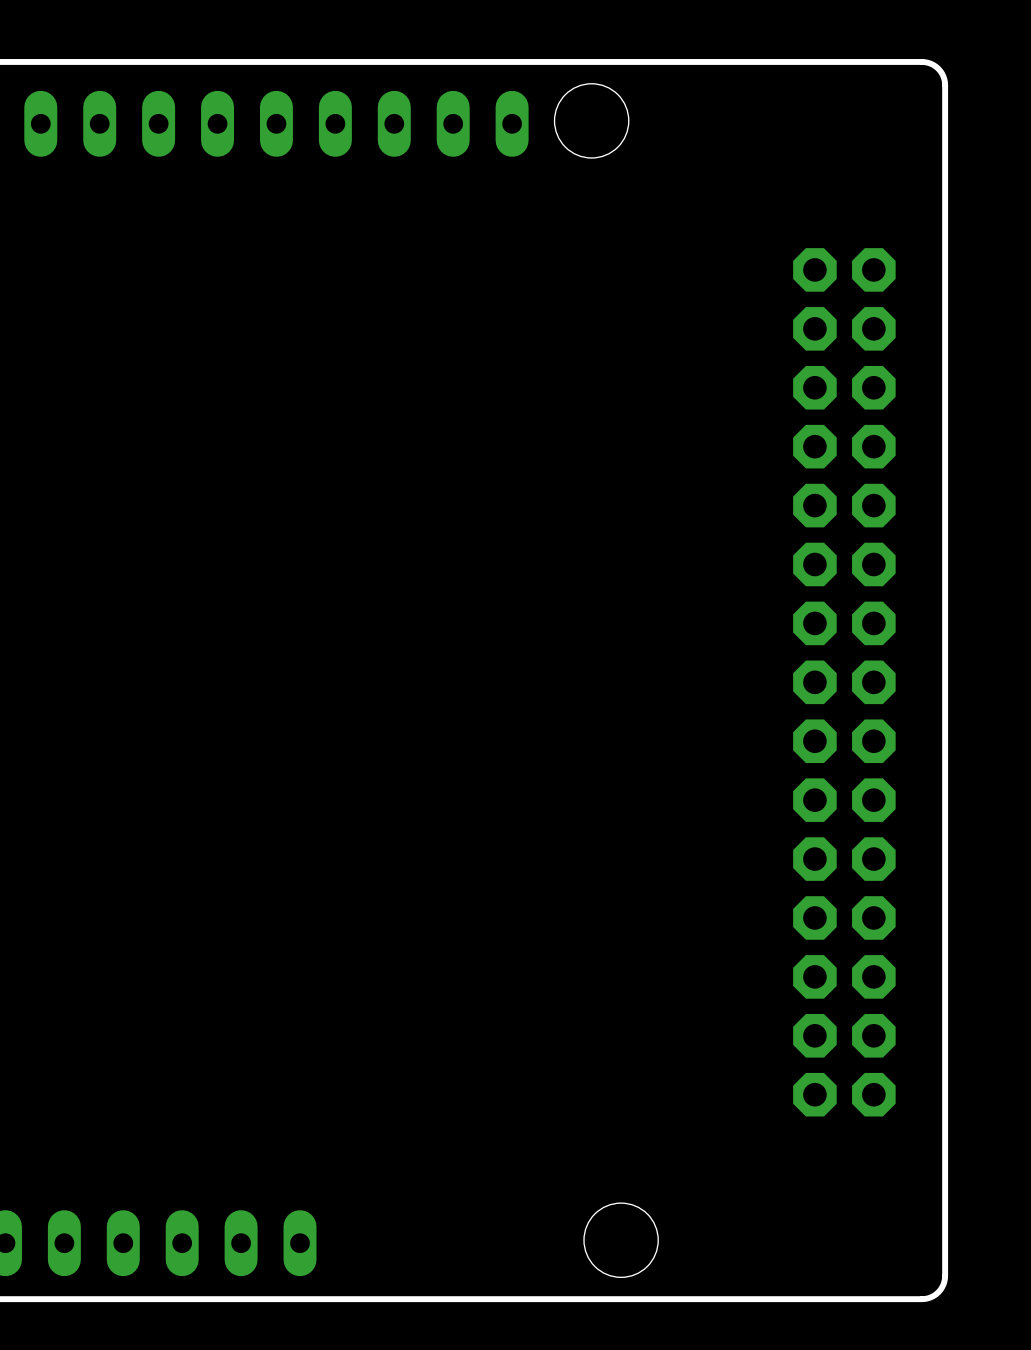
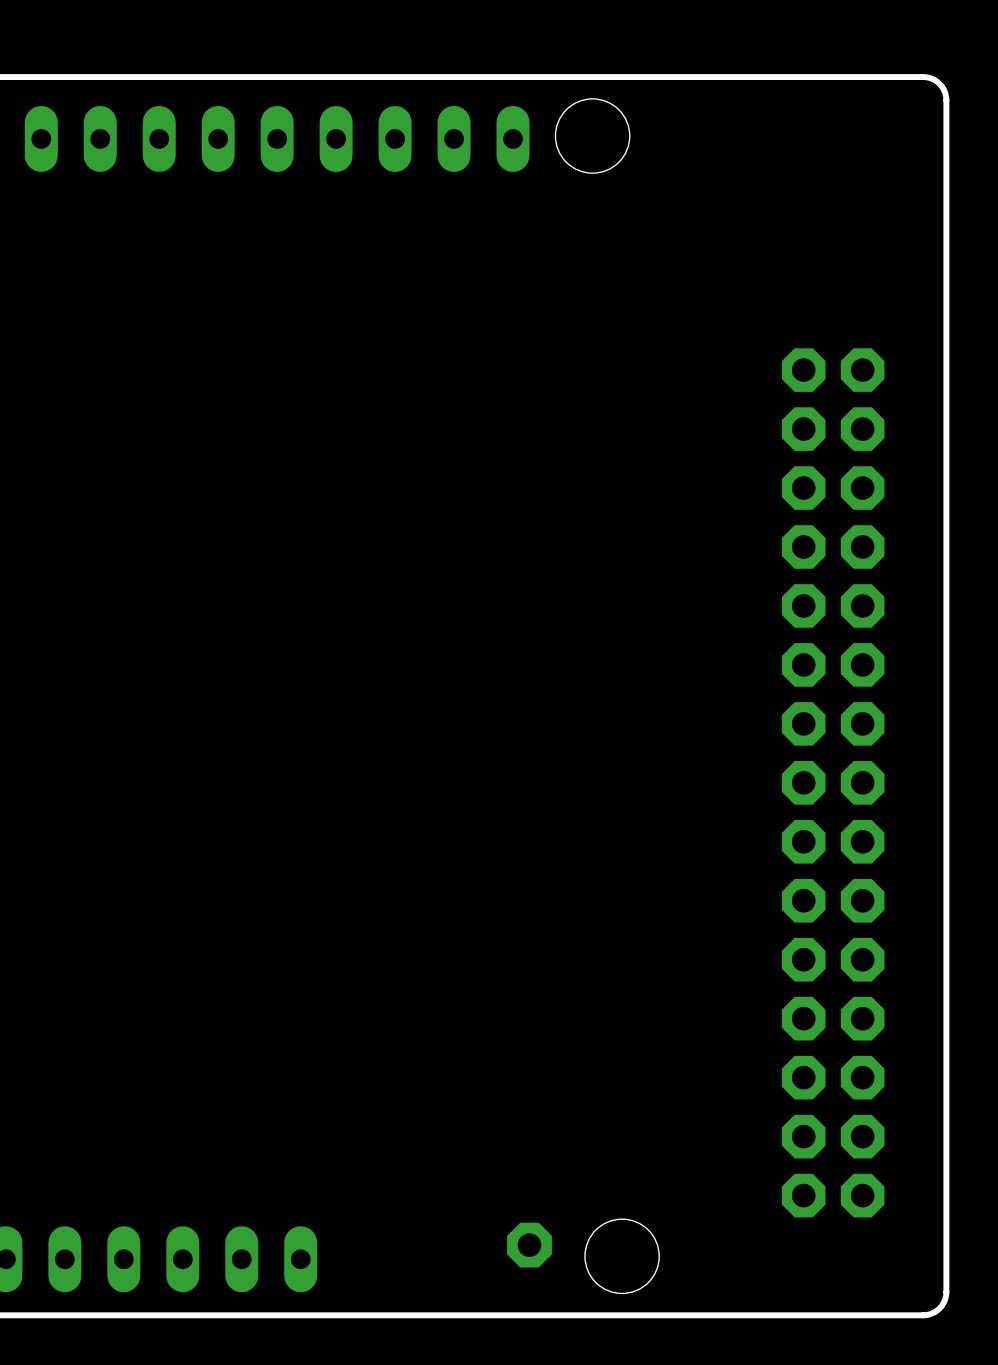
part position: (844, 682) -> (833, 782)
part: none -> (529, 1245)

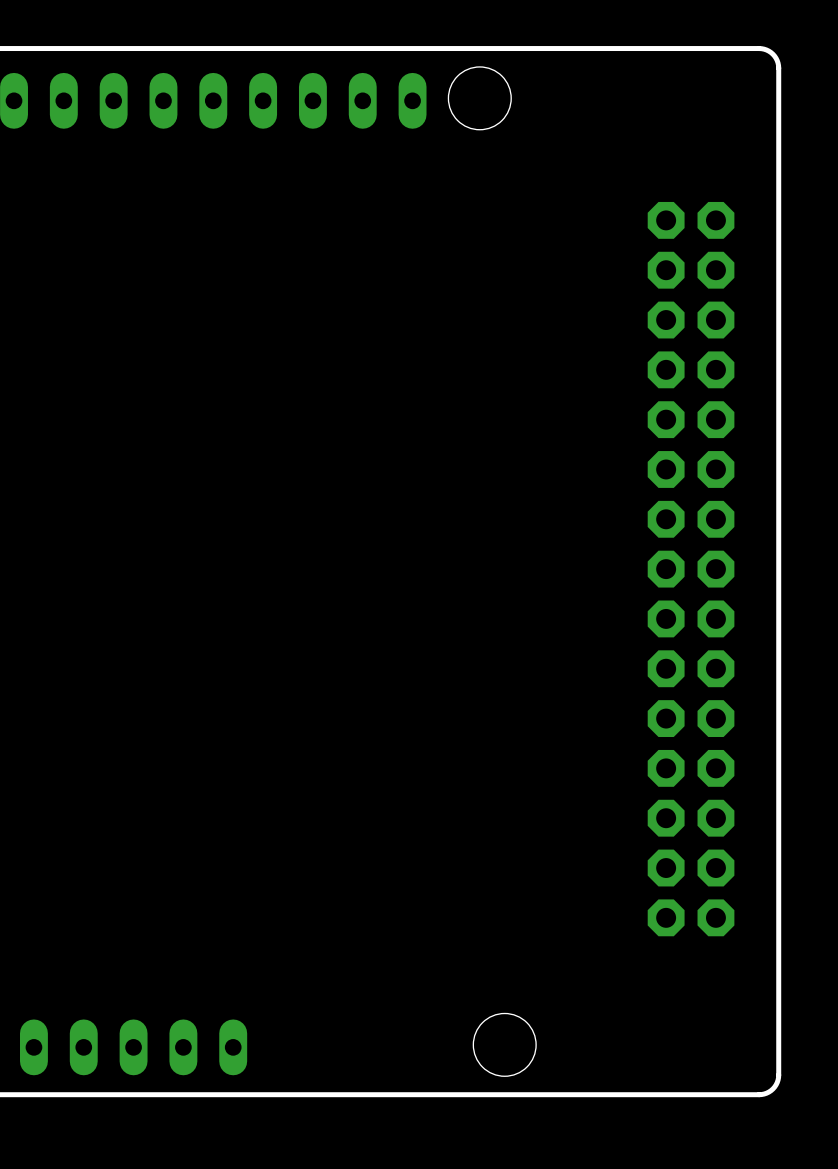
part position: (833, 782) -> (691, 569)
part: (529, 1245) -> none

